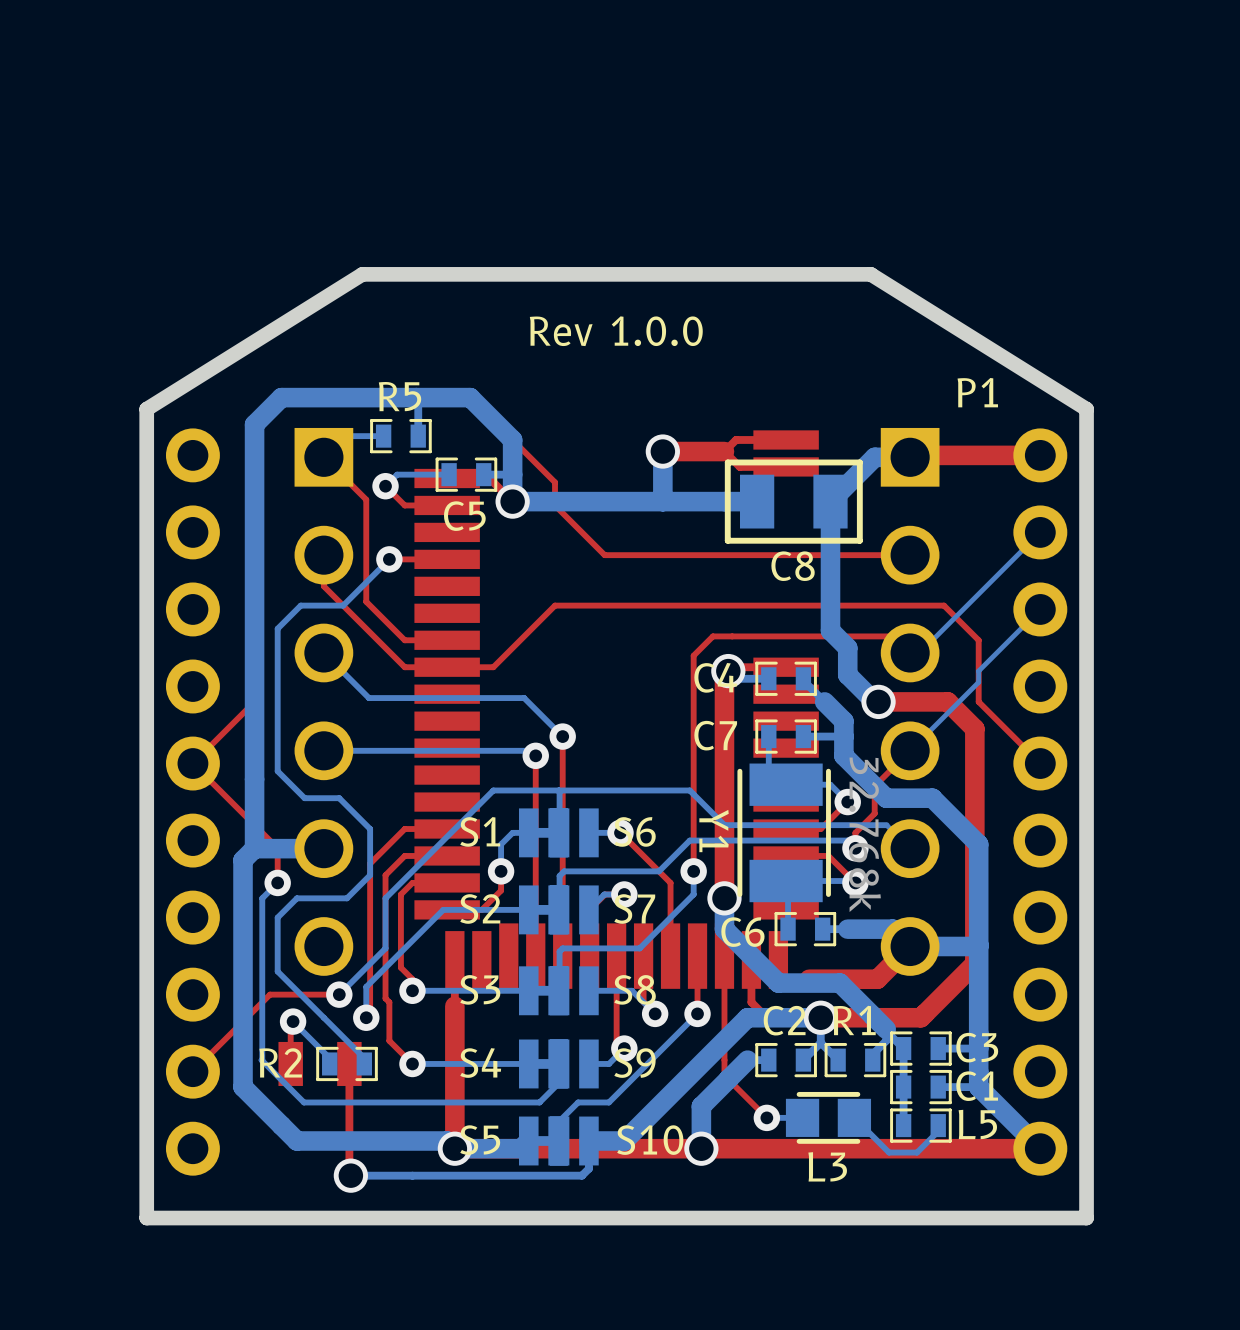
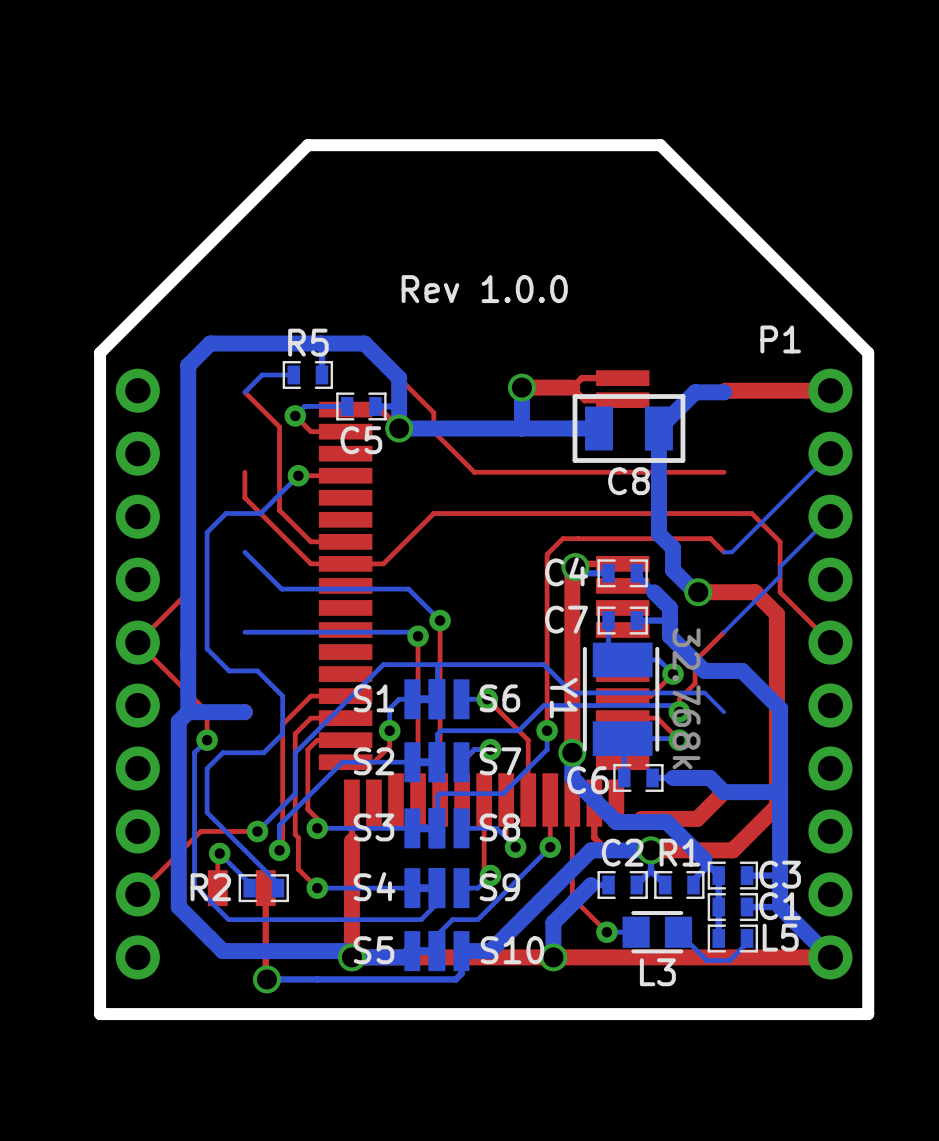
board edge: (1086, 409) (870, 274) (362, 274) (146, 409) -> (868, 352) (660, 145) (307, 145) (100, 352)
part: (323, 701) -> none
part: (910, 701) -> none

